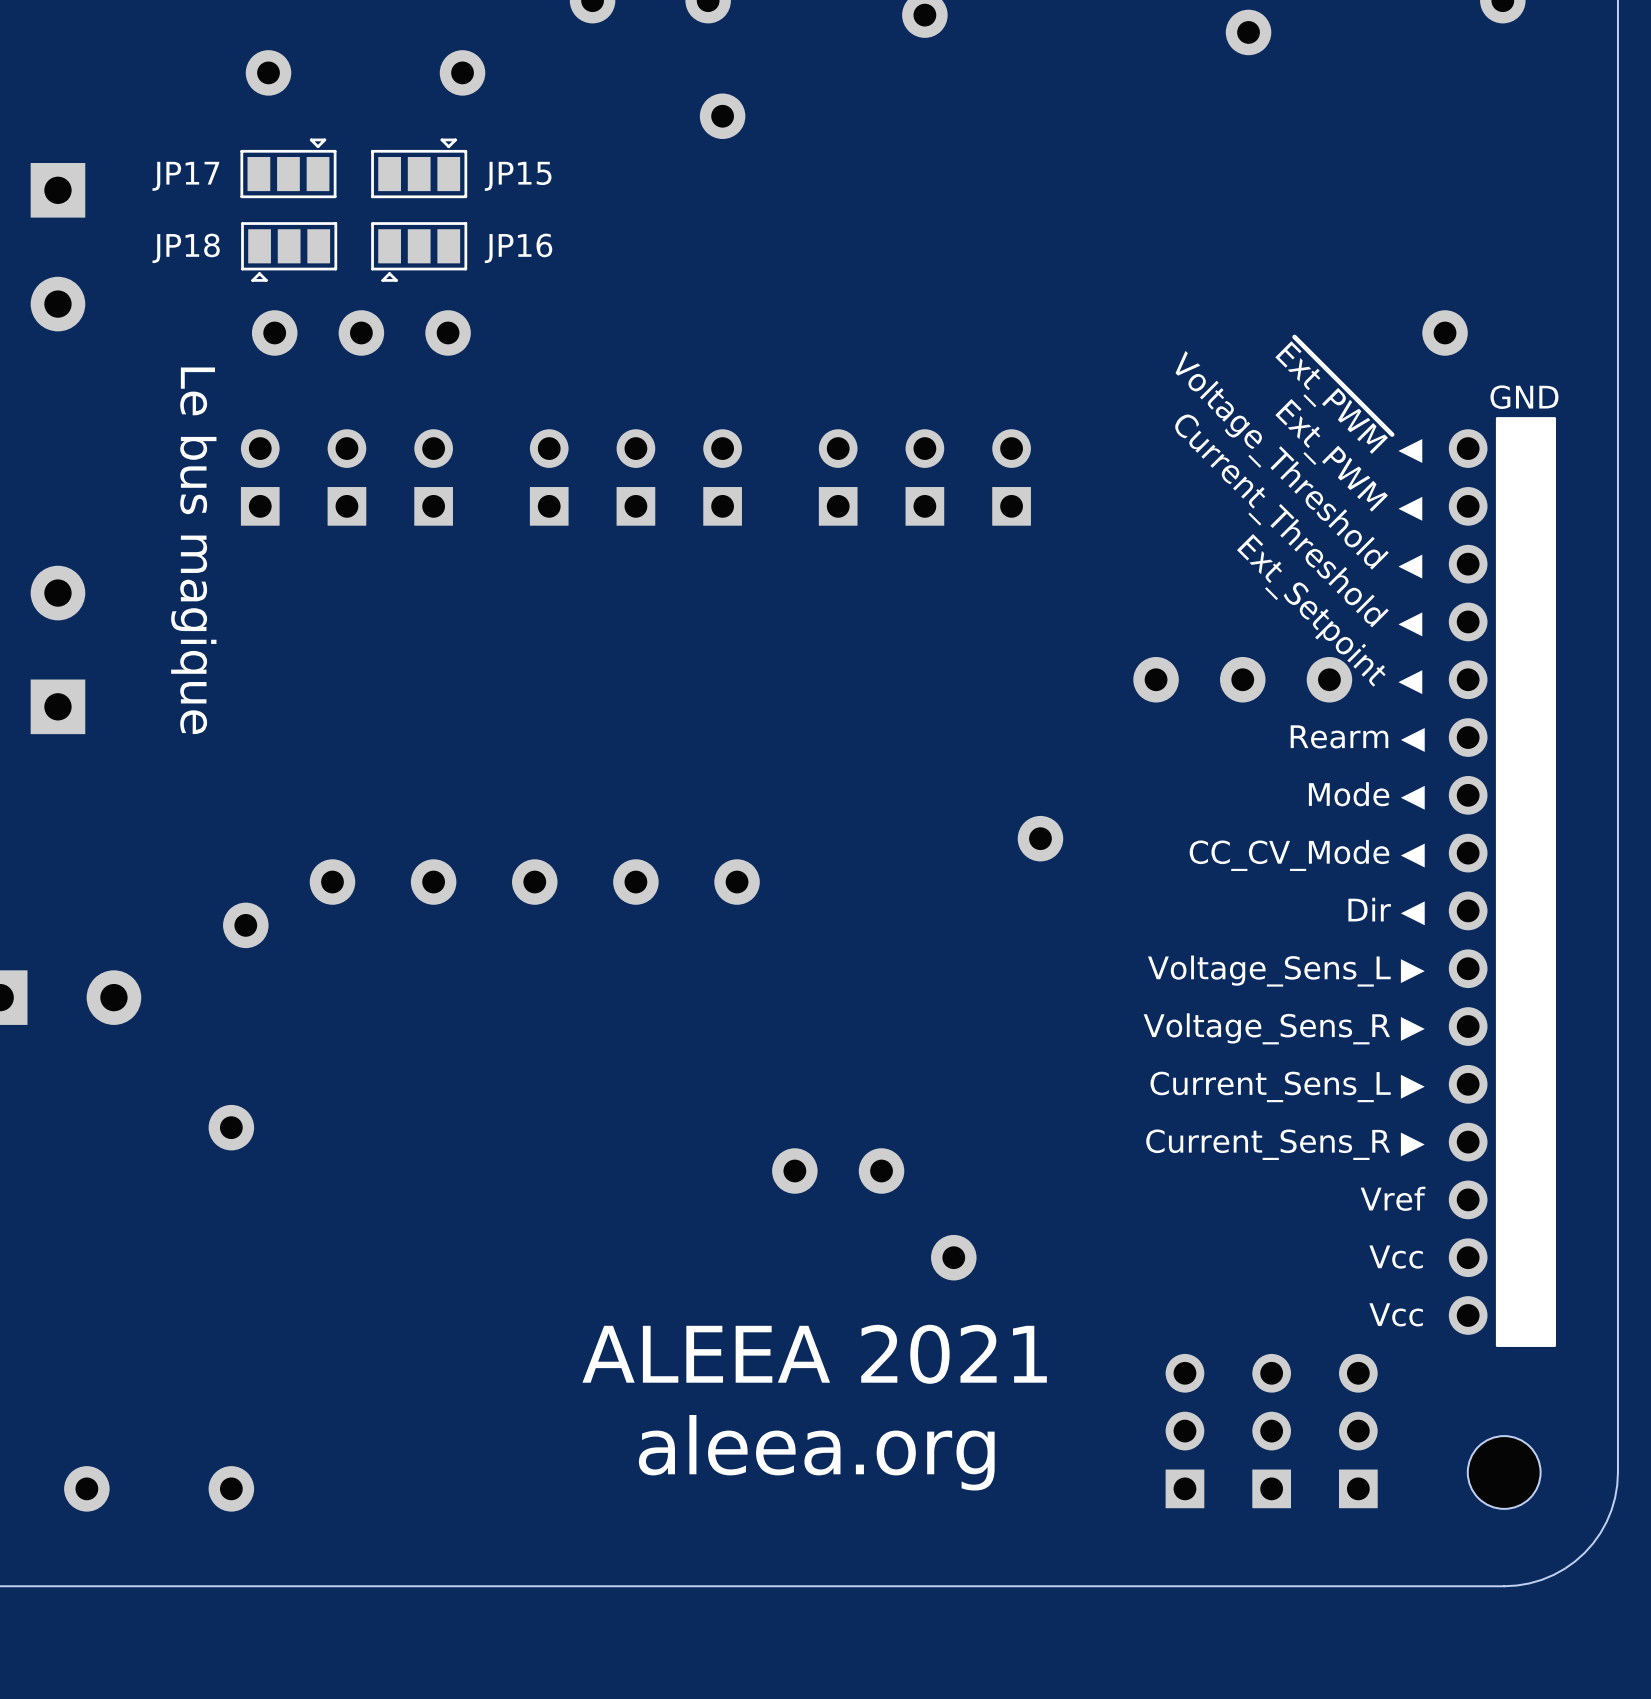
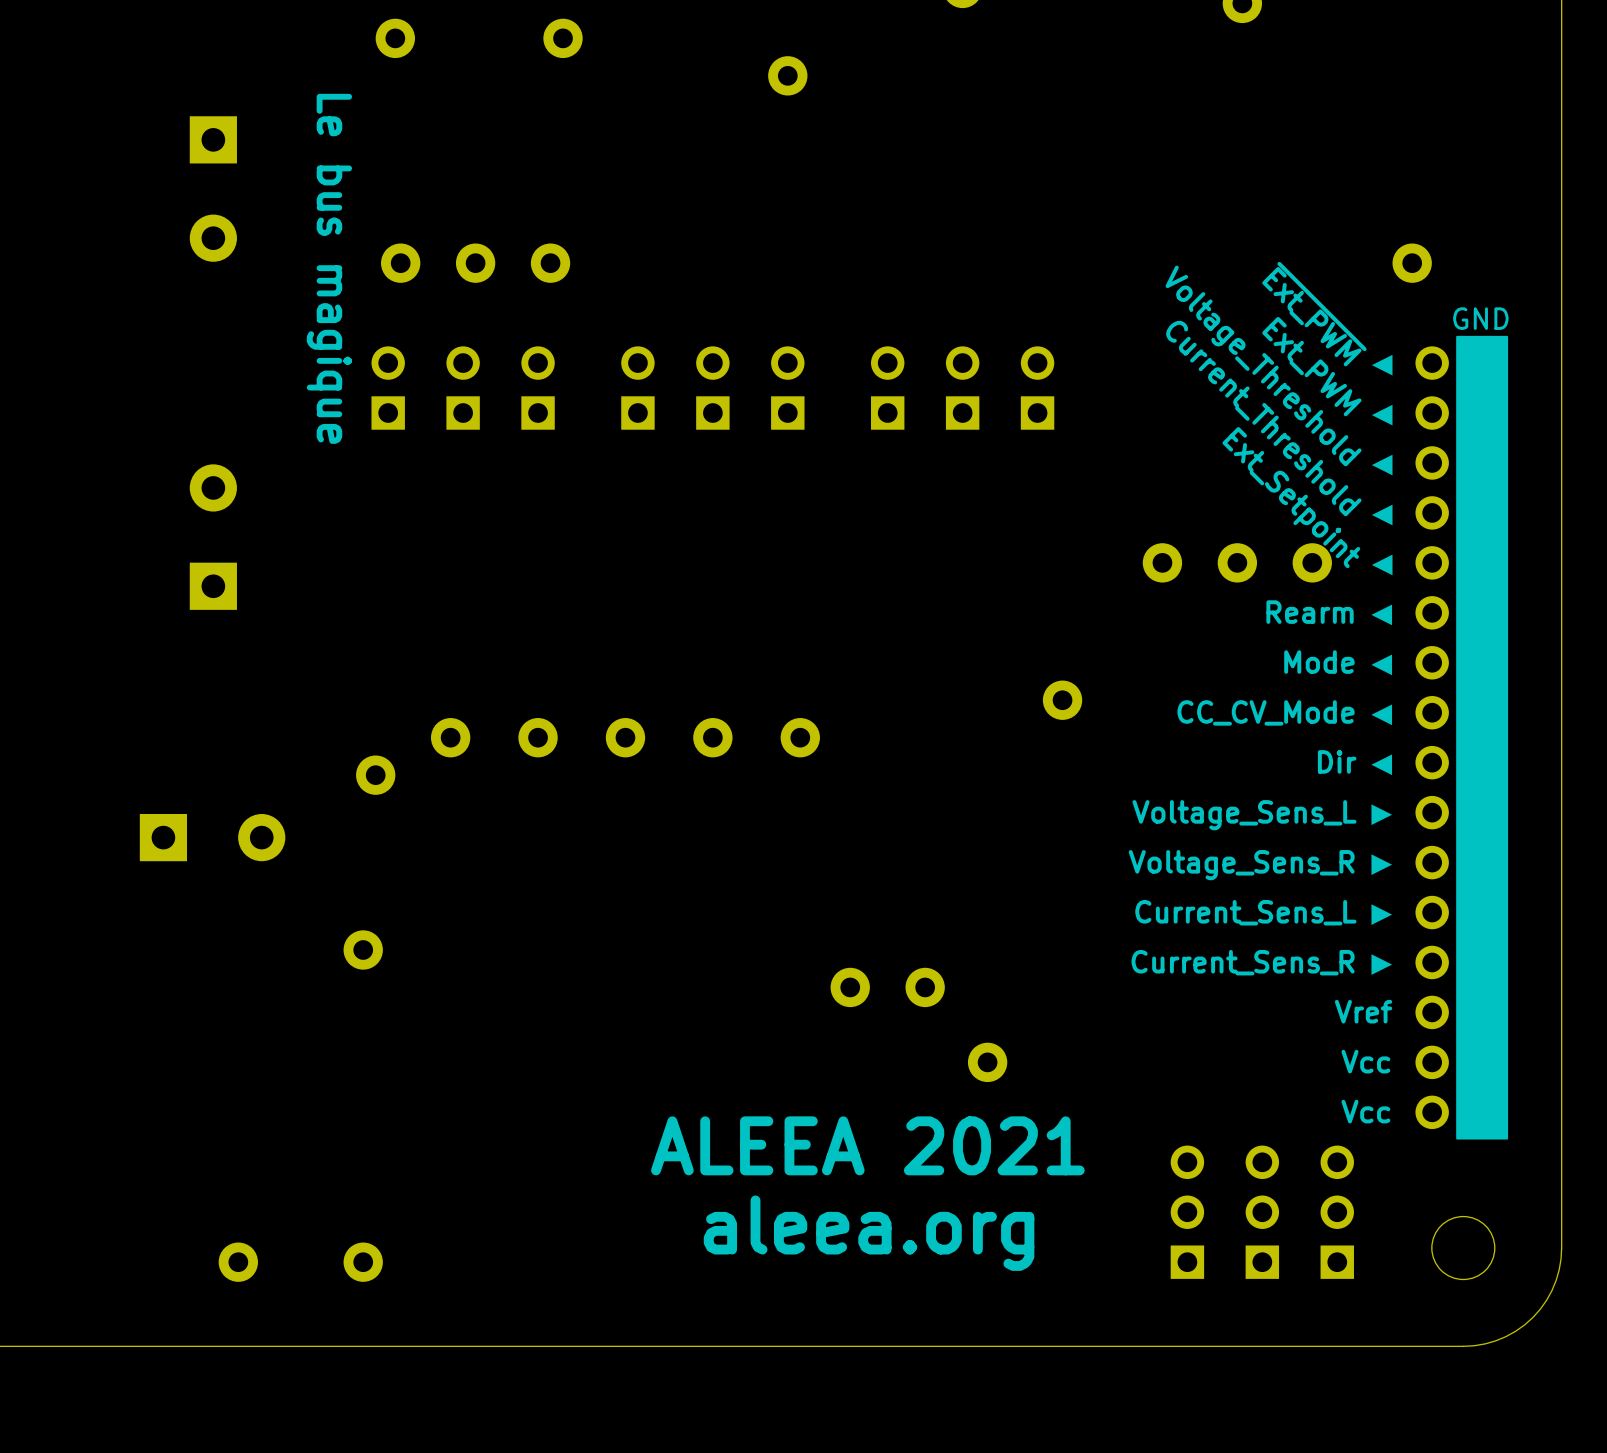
JP17: (288, 168) -> none
JP15: (419, 168) -> none
JP18: (289, 251) -> none
JP16: (419, 251) -> none
text position: Le bus magique (193, 550) -> Le bus magique (329, 268)

